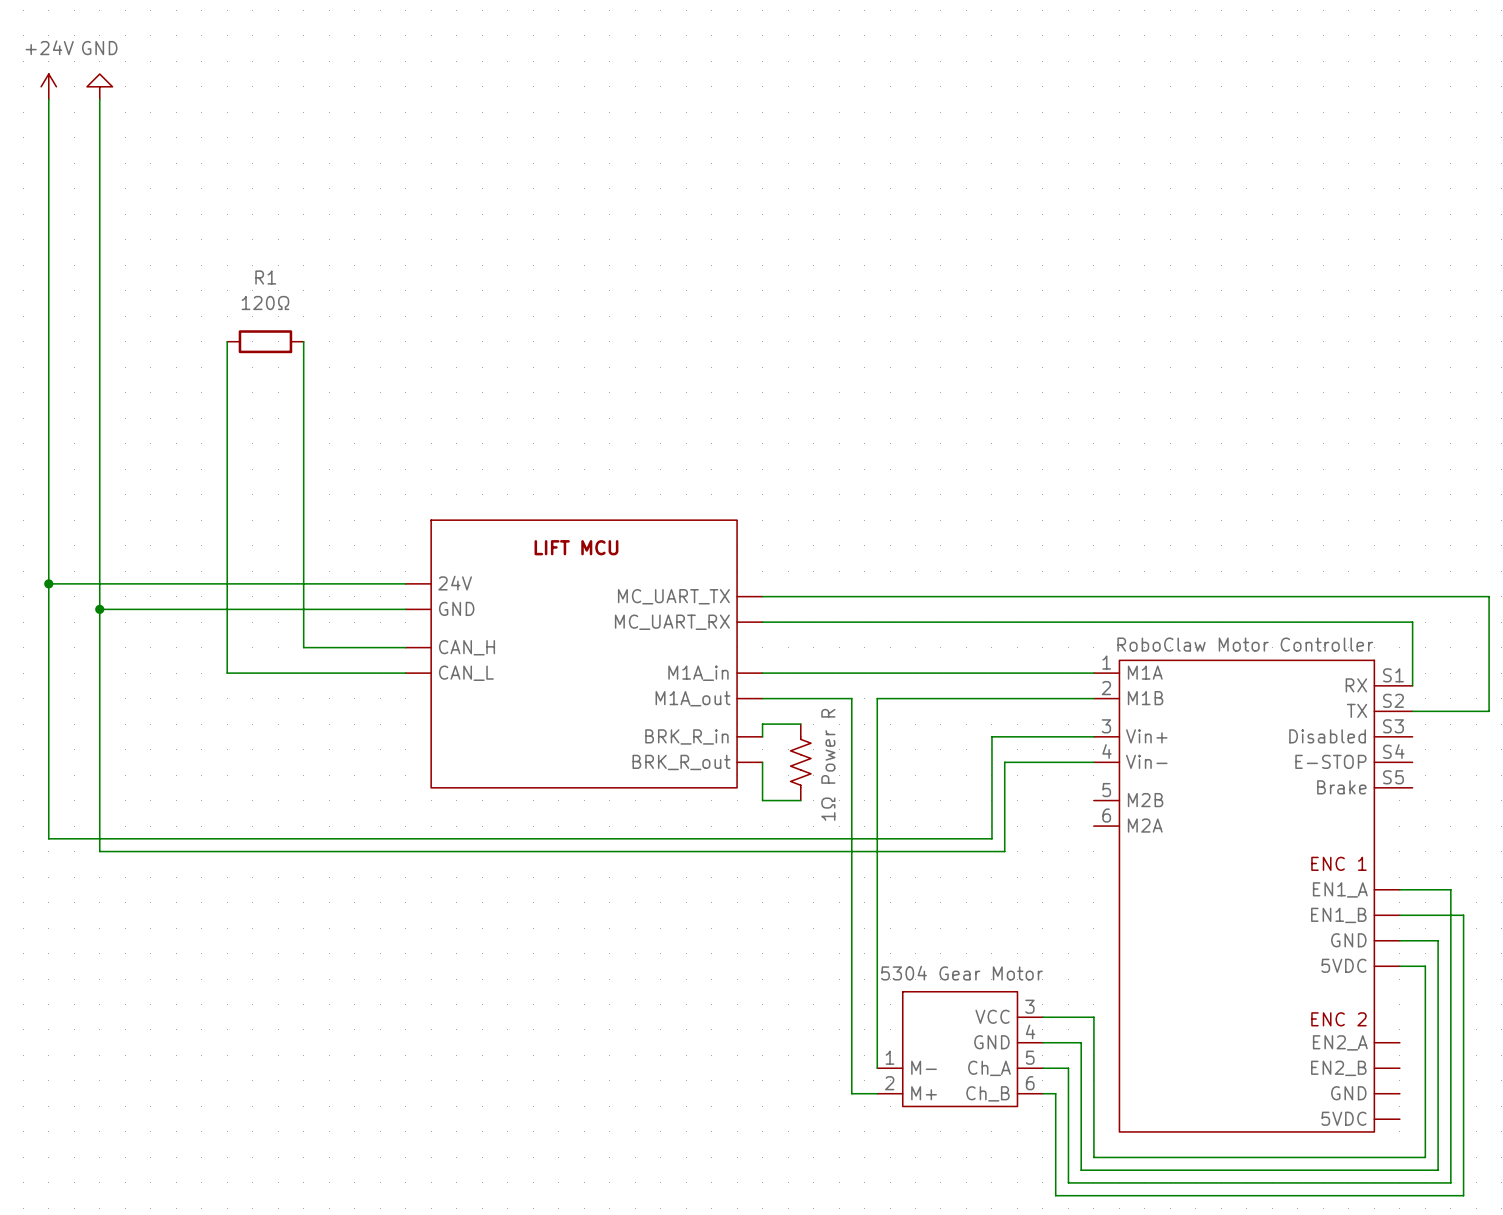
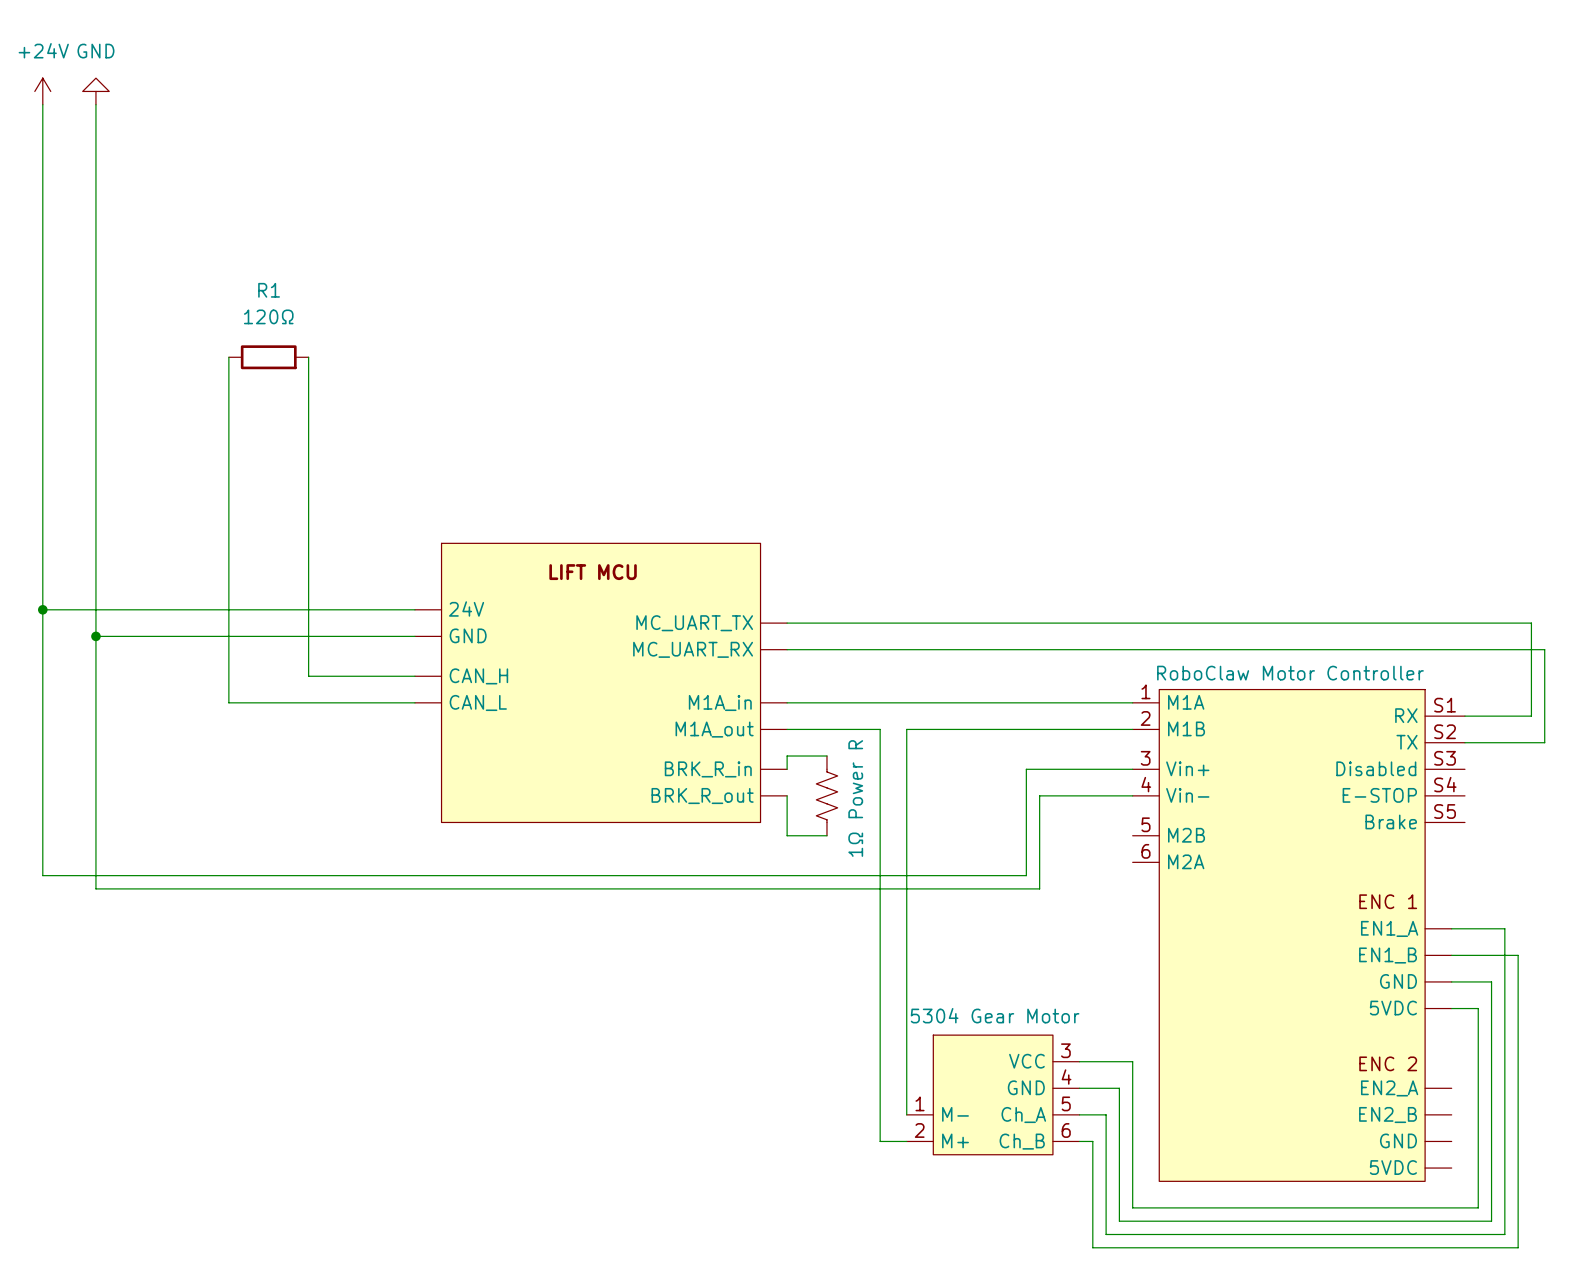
wire: (1476, 596) (1489, 596) (1489, 622) -> (1464, 649) (1544, 649)
wire: (1412, 622) (1412, 685) -> (1531, 623) (1531, 716) (1464, 716)

